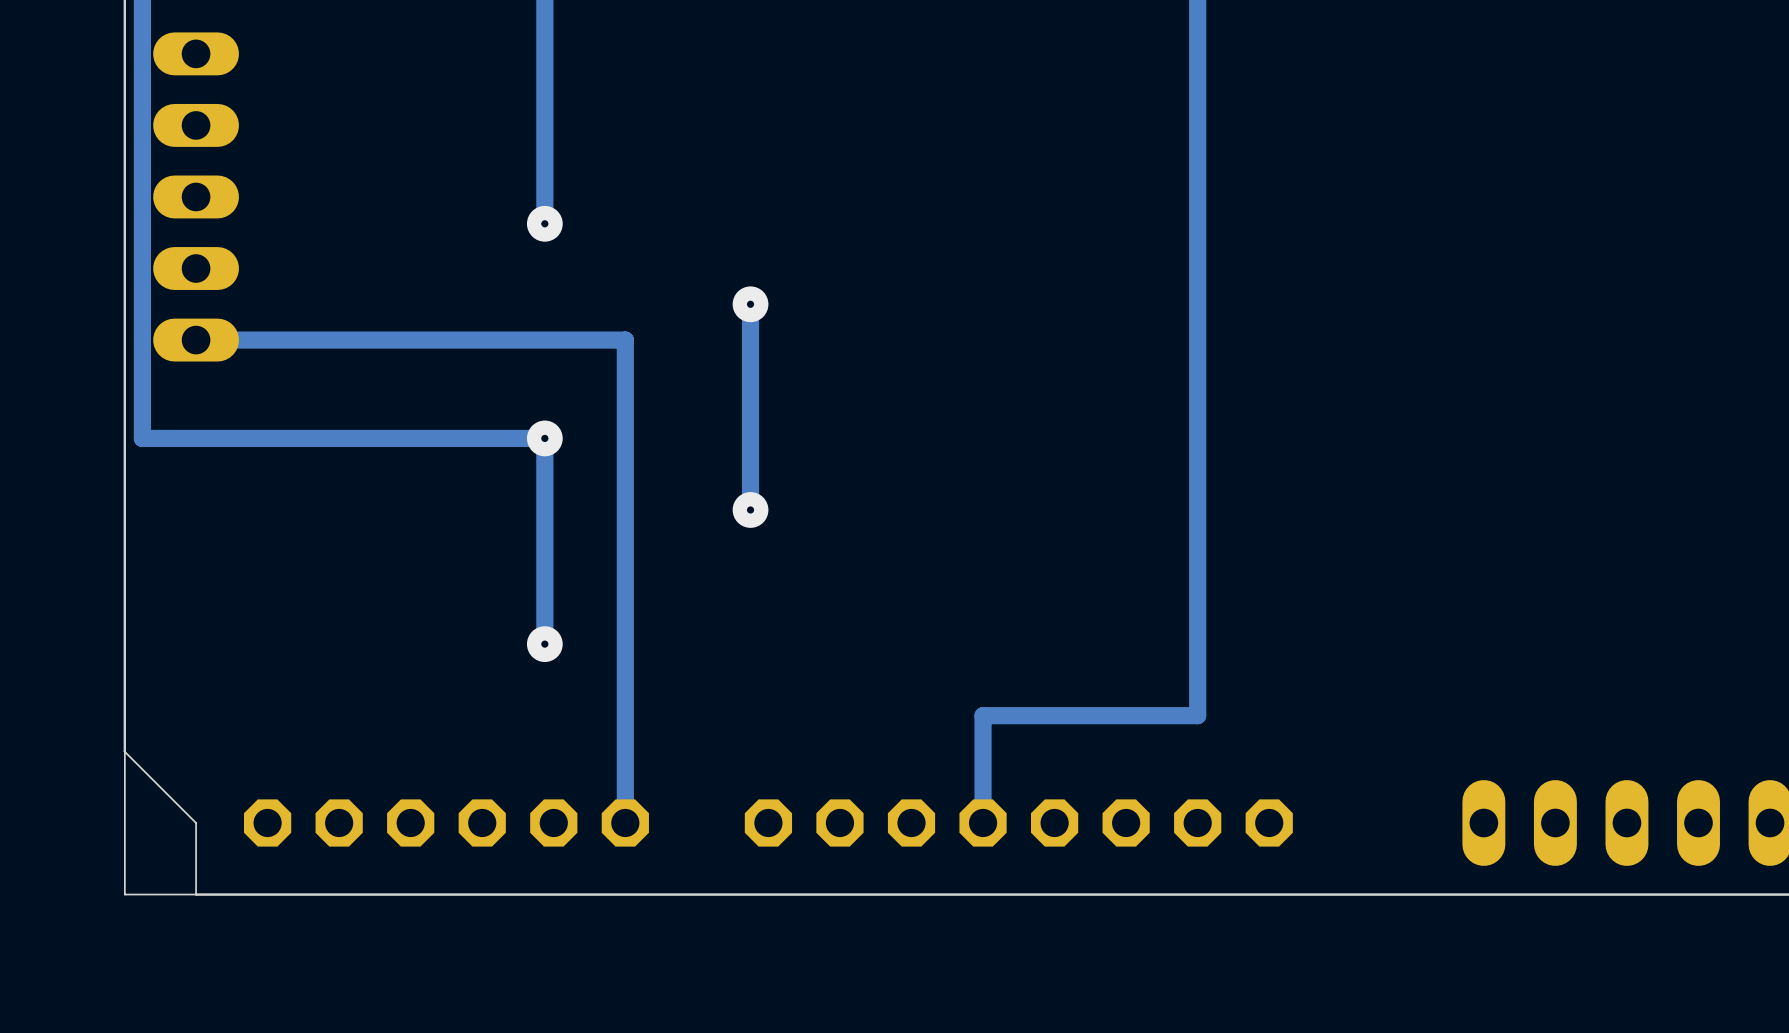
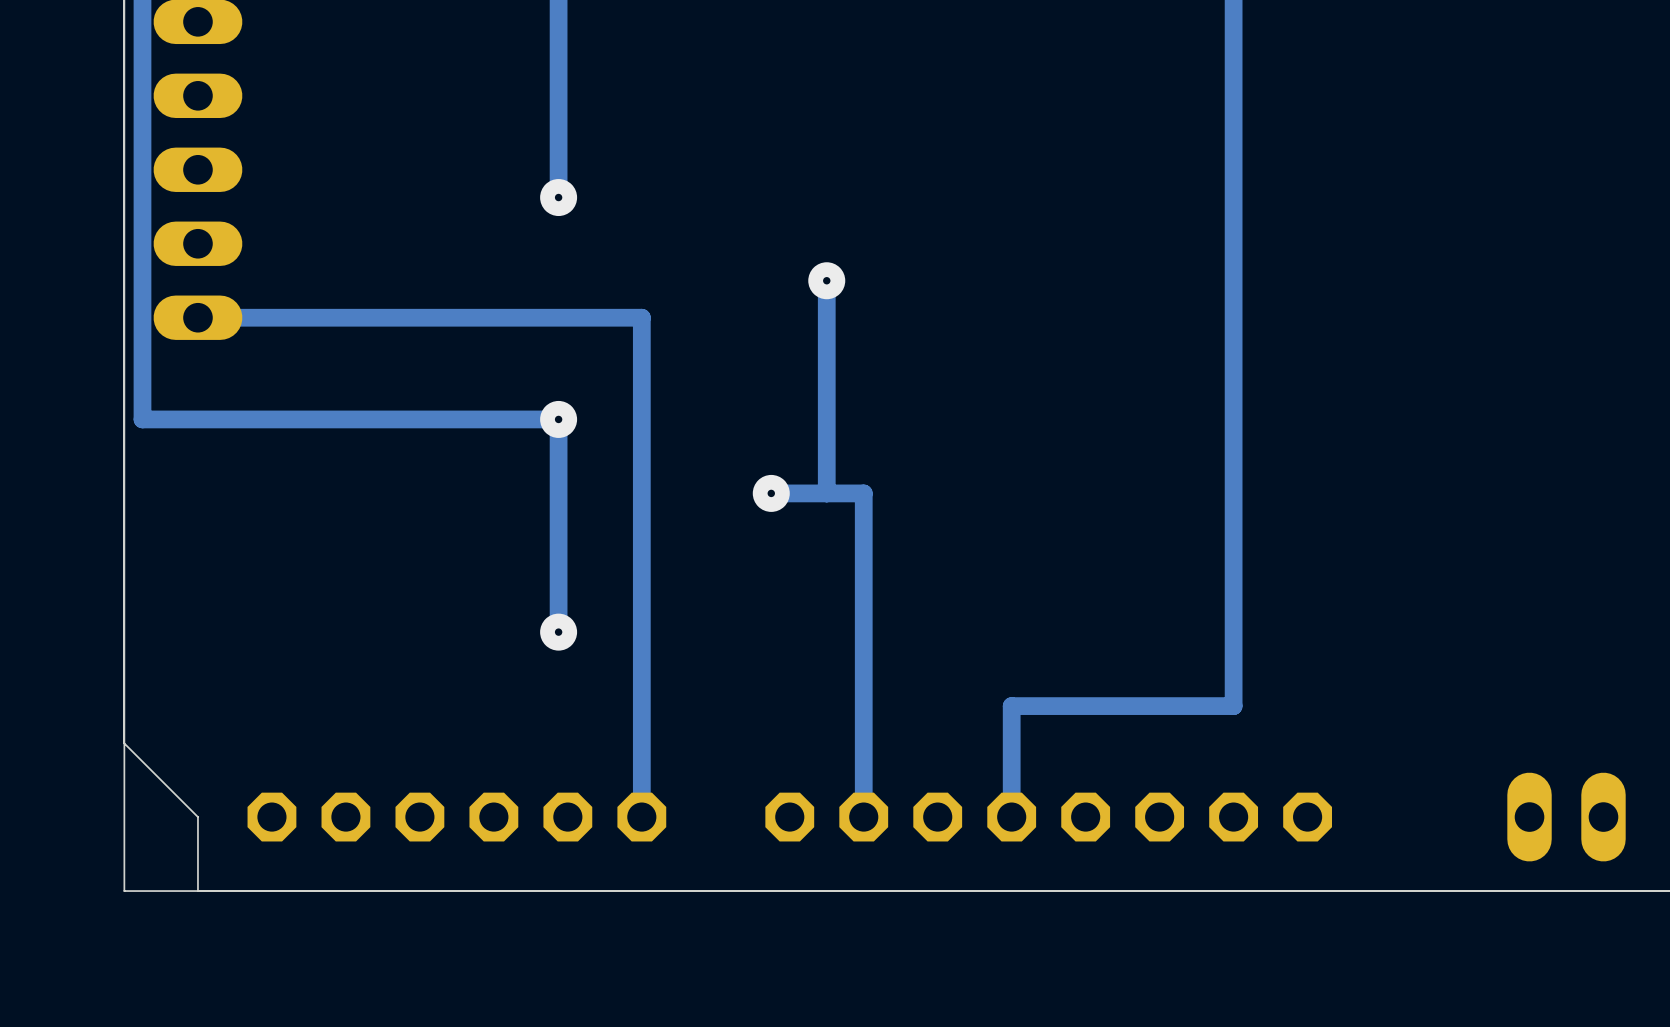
track: (750, 304) (750, 509) -> (863, 817) (863, 493) (771, 493)
via position: (750, 304) -> (826, 280)
track: none -> (826, 280) (826, 493)

